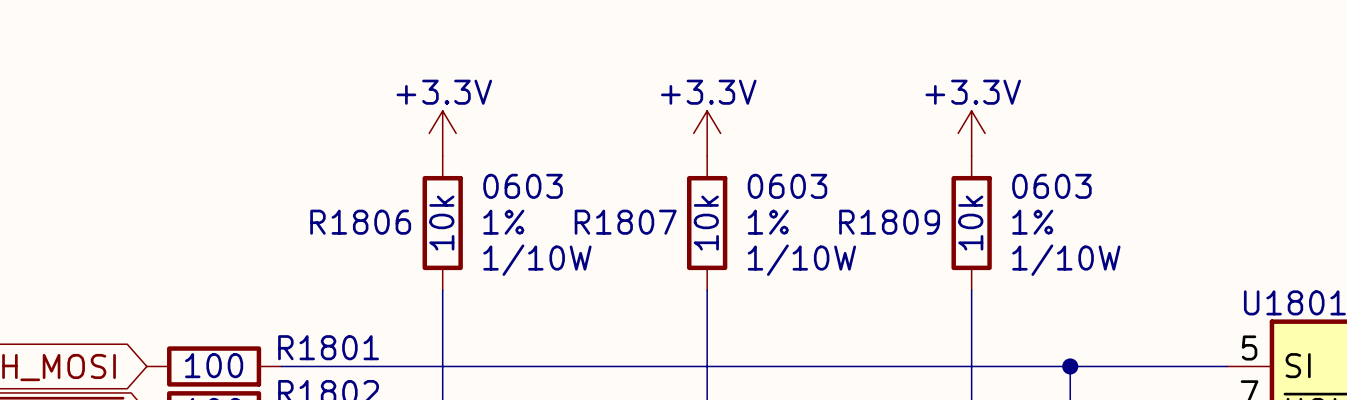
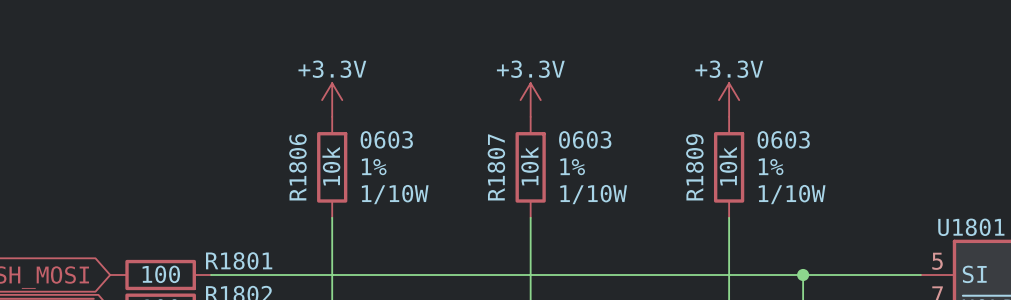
R1806 name rotation: 0° (360, 222) -> 90° counterclockwise (297, 167)
R1807 name rotation: 0° (625, 222) -> 90° counterclockwise (496, 167)
R1809 name rotation: 0° (889, 222) -> 90° counterclockwise (694, 167)

